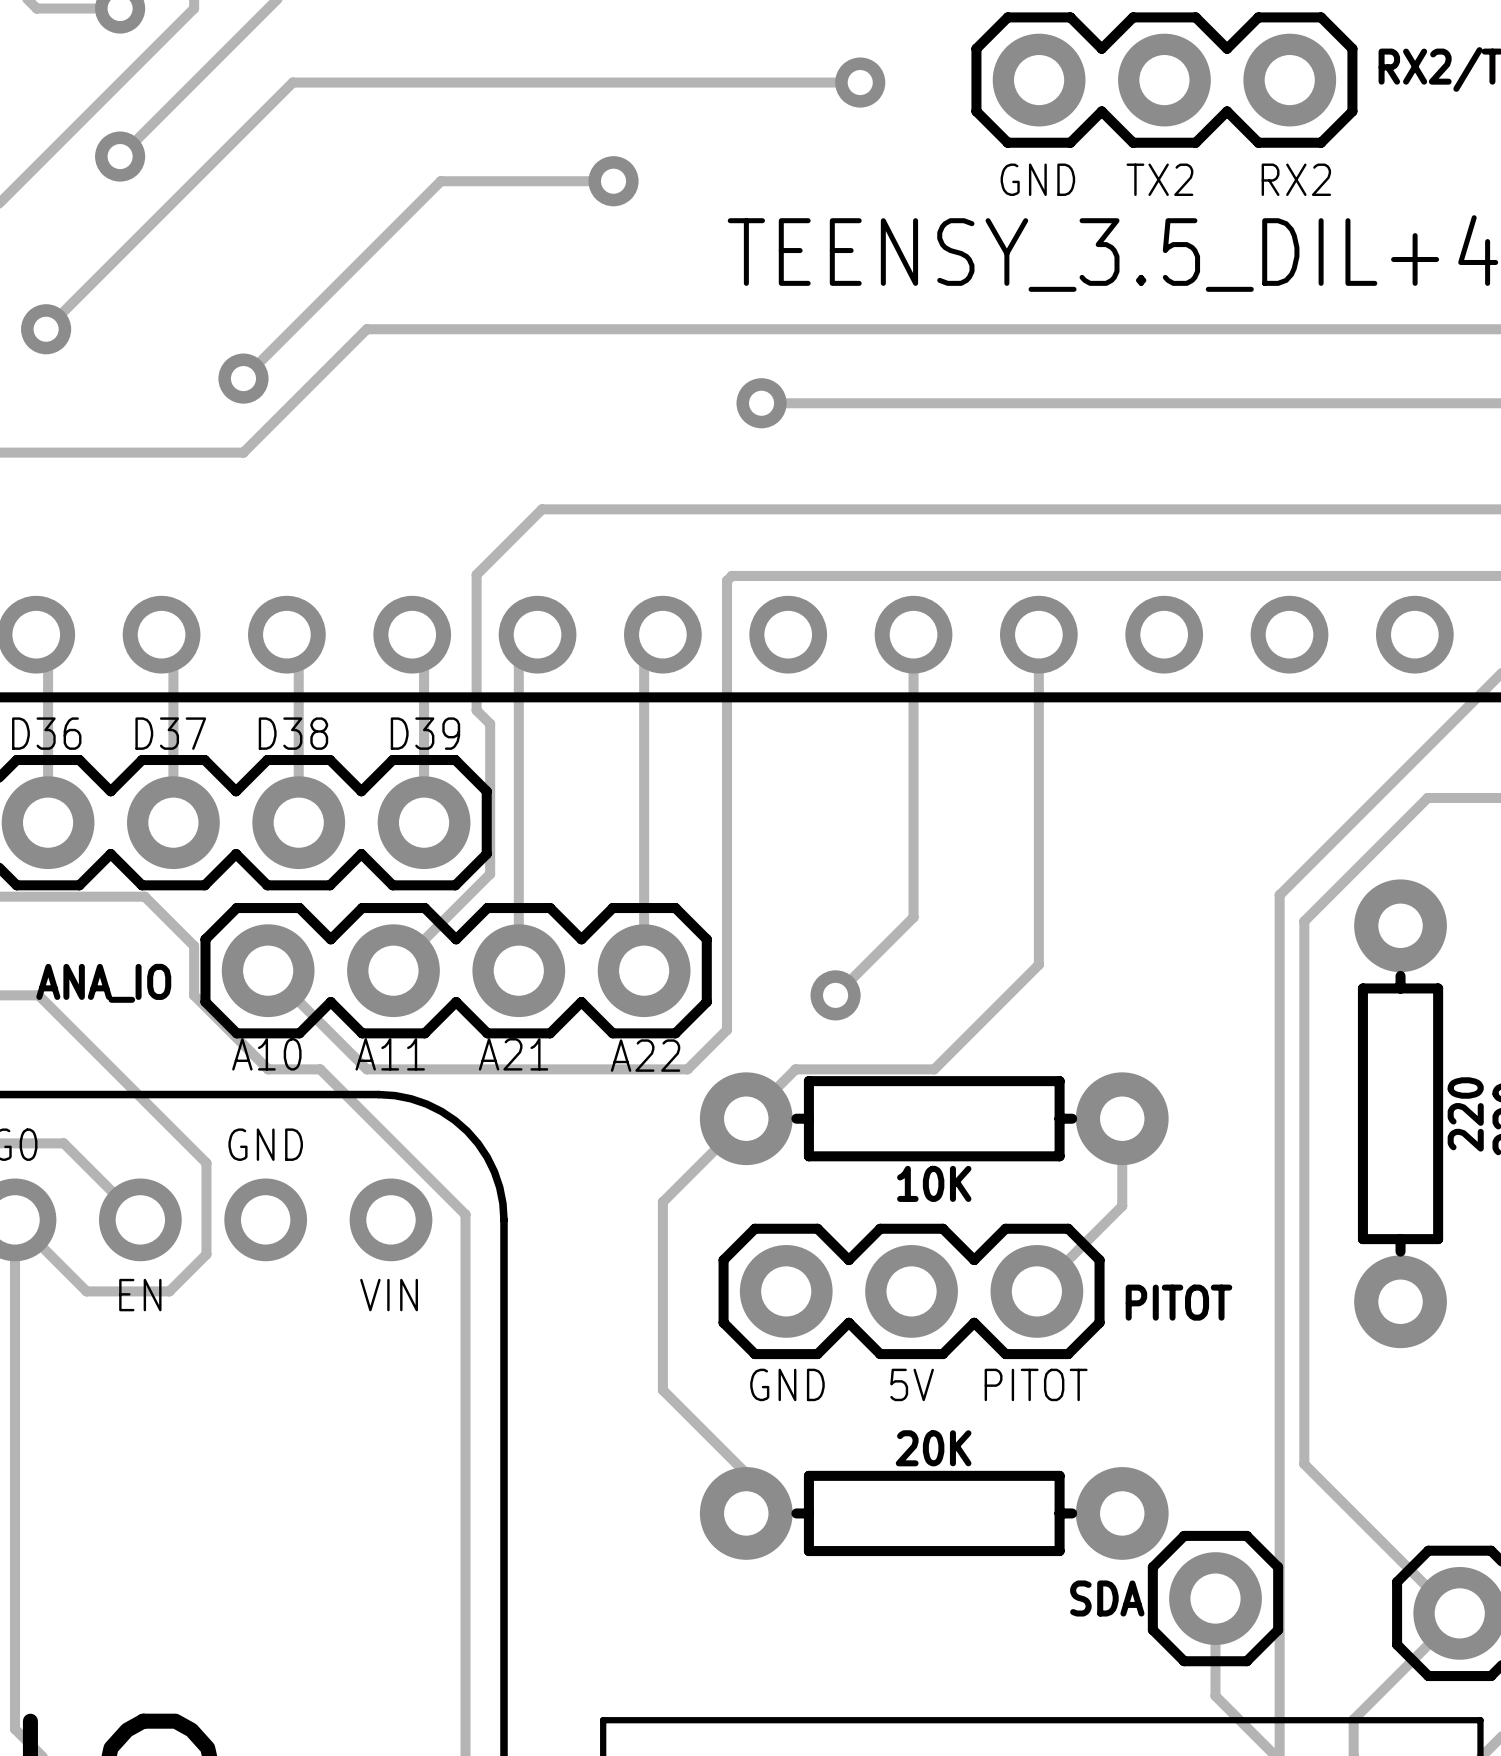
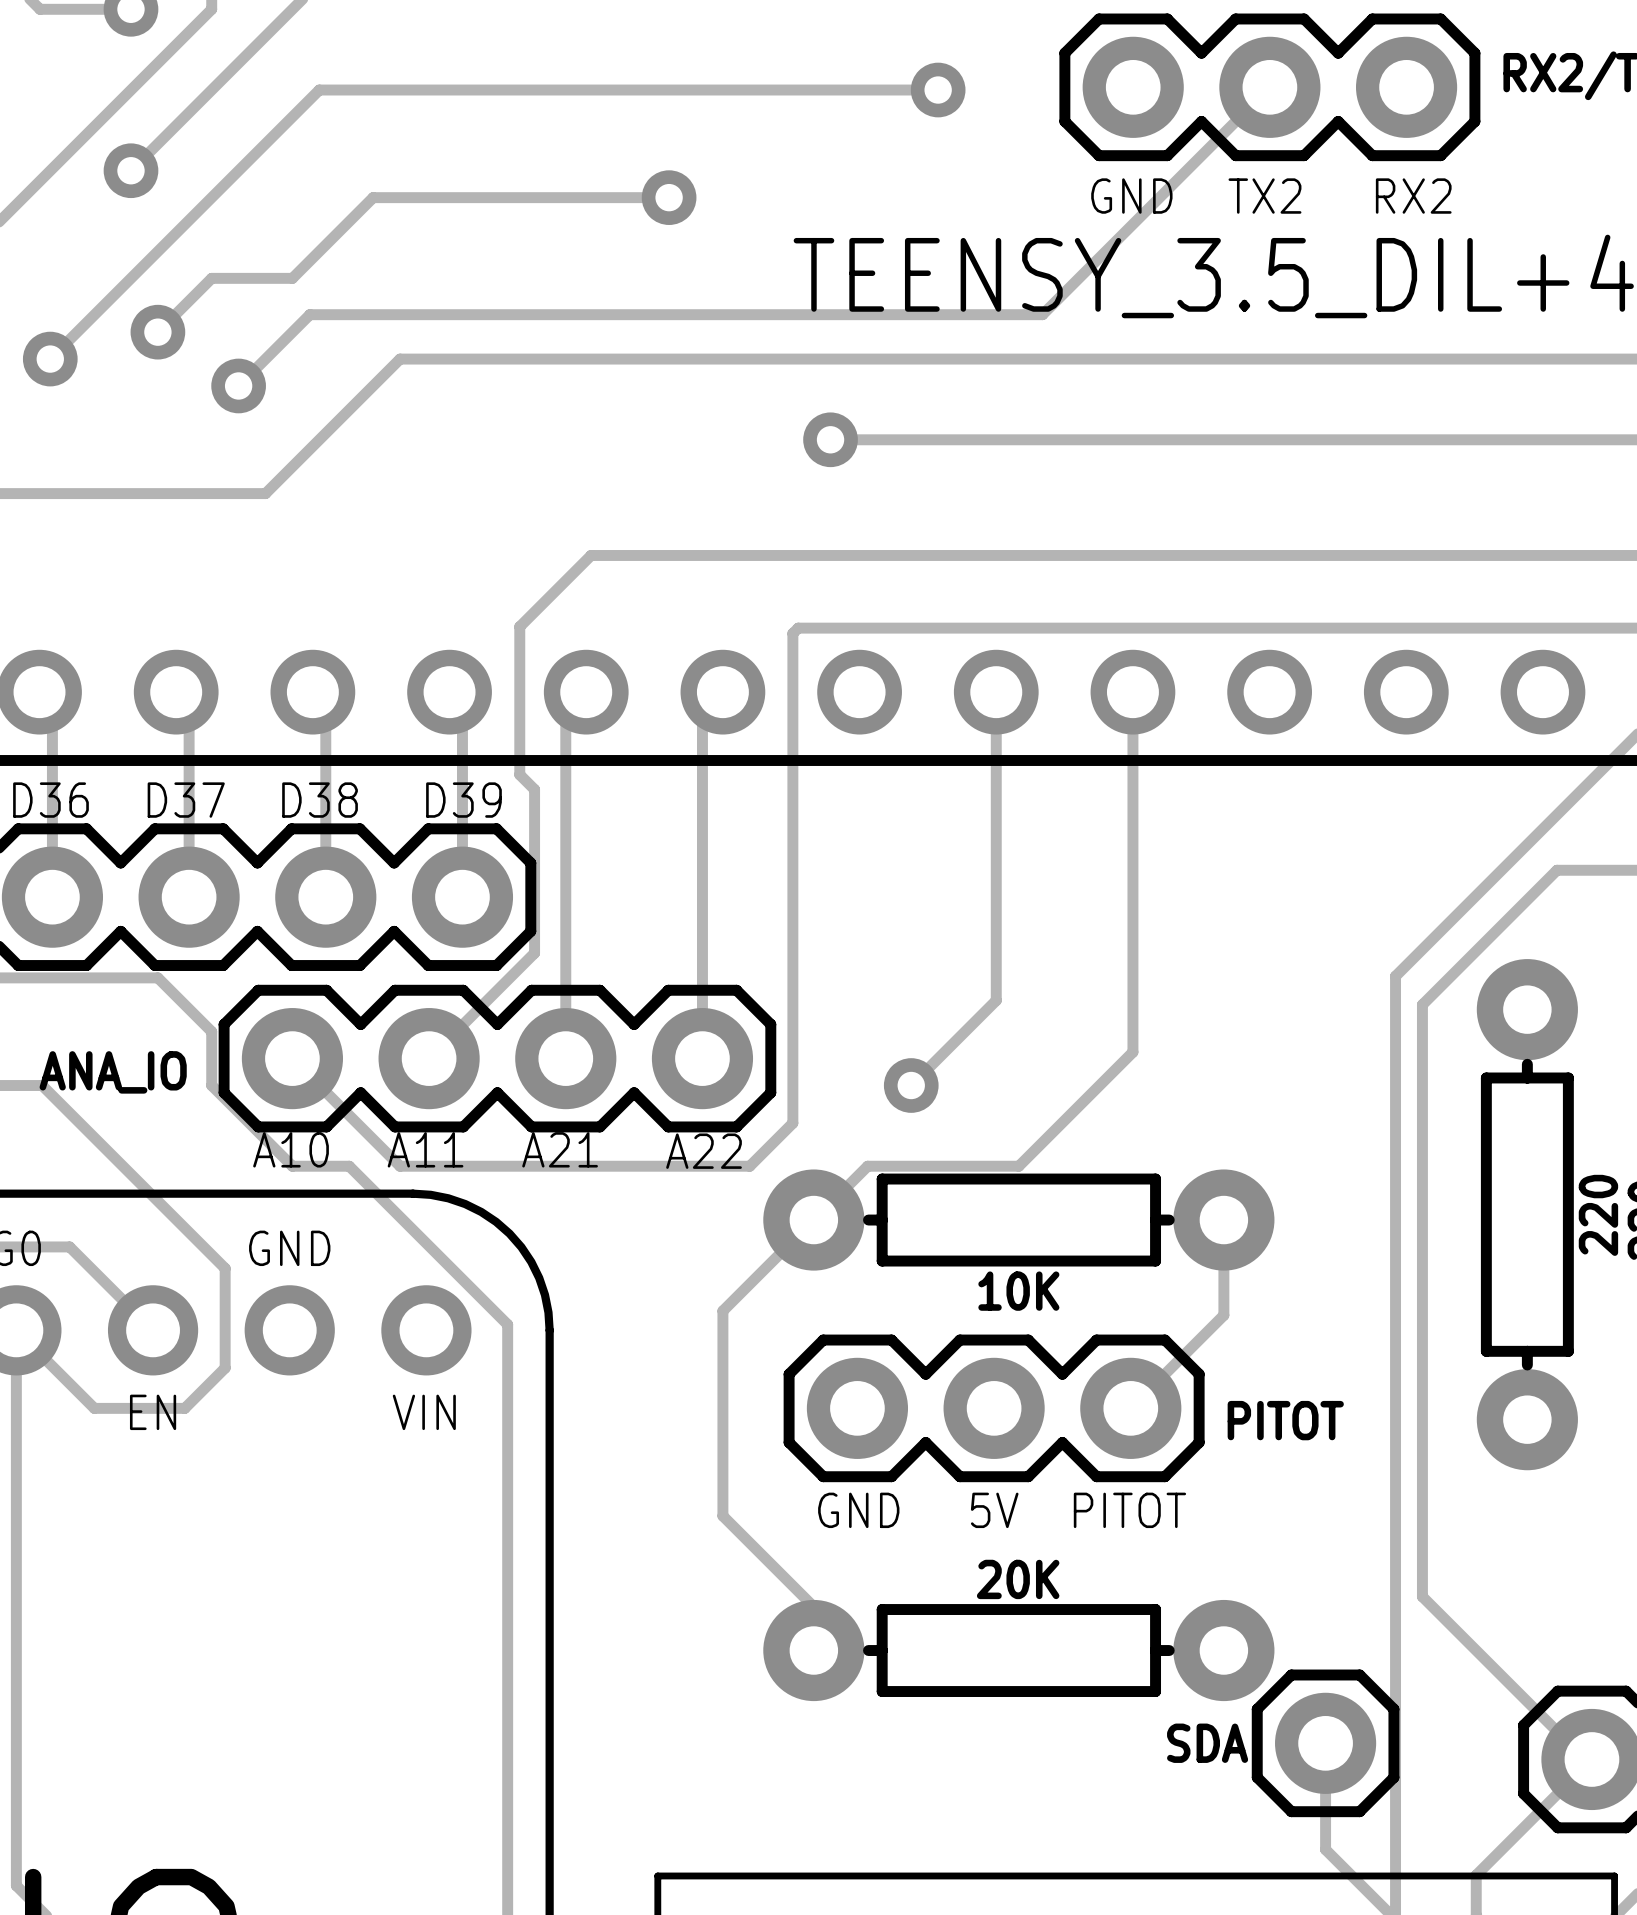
track: none -> (1269, 87) (1042, 314) (309, 314) (238, 385)
track: (440, 181) (243, 378) -> (480, 197) (373, 197) (292, 278) (211, 278) (157, 332)
via: none -> (157, 332)
via position: (243, 378) -> (238, 385)

